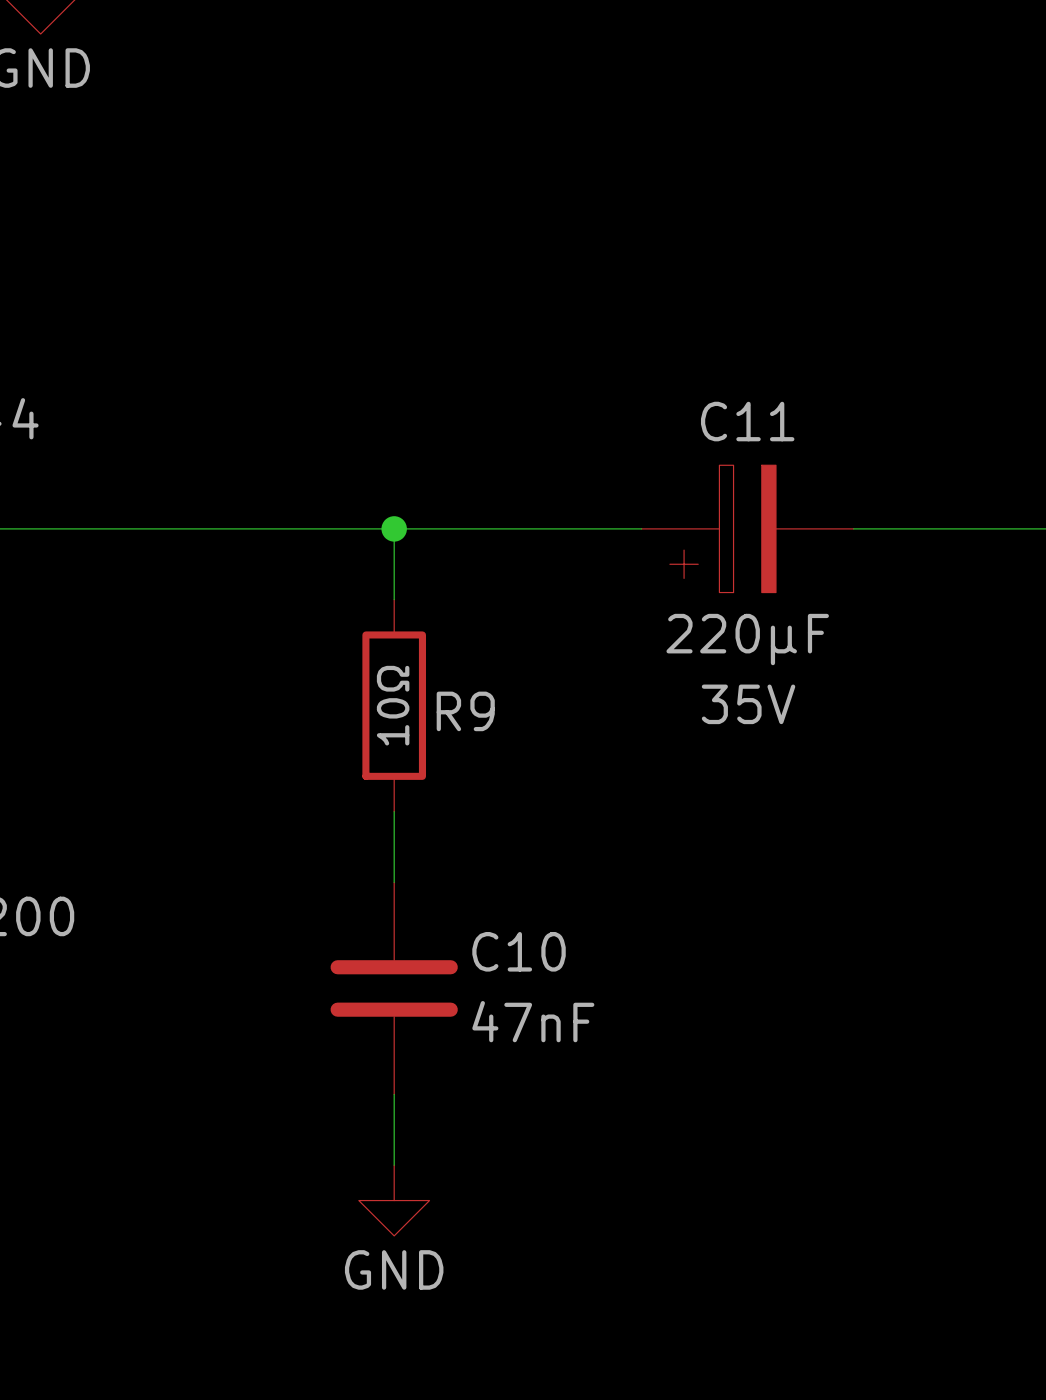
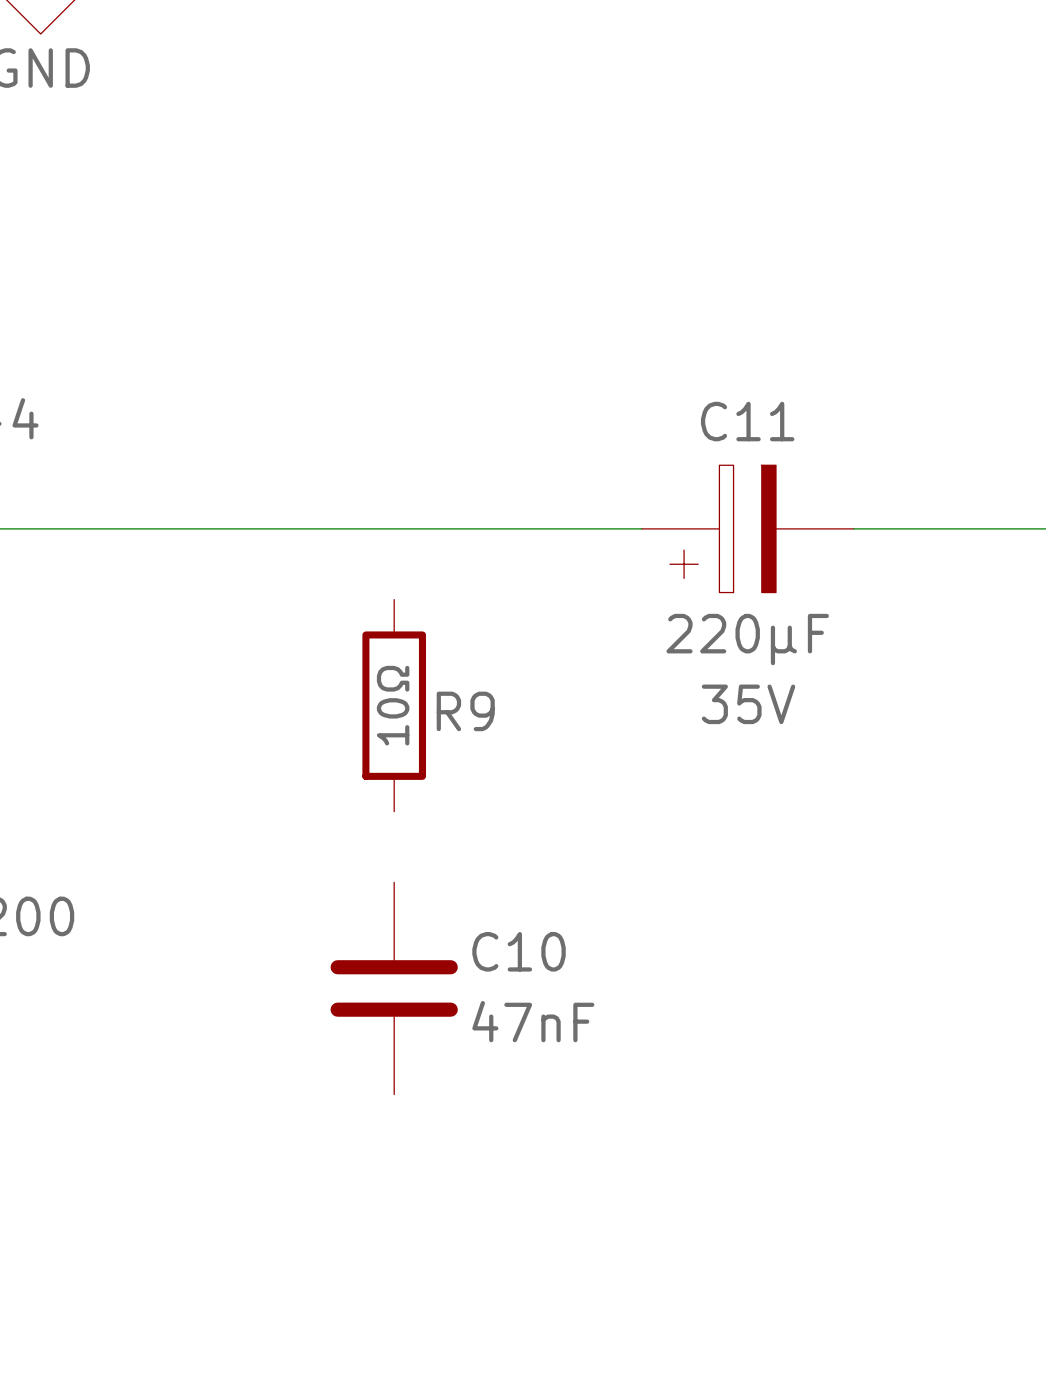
wire: (394, 528) (394, 599) -> none
junction: (394, 528) -> none
wire: (394, 811) (394, 882) -> none
wire: (394, 1094) (394, 1165) -> none
power symbol: GND (394, 1200) -> none

